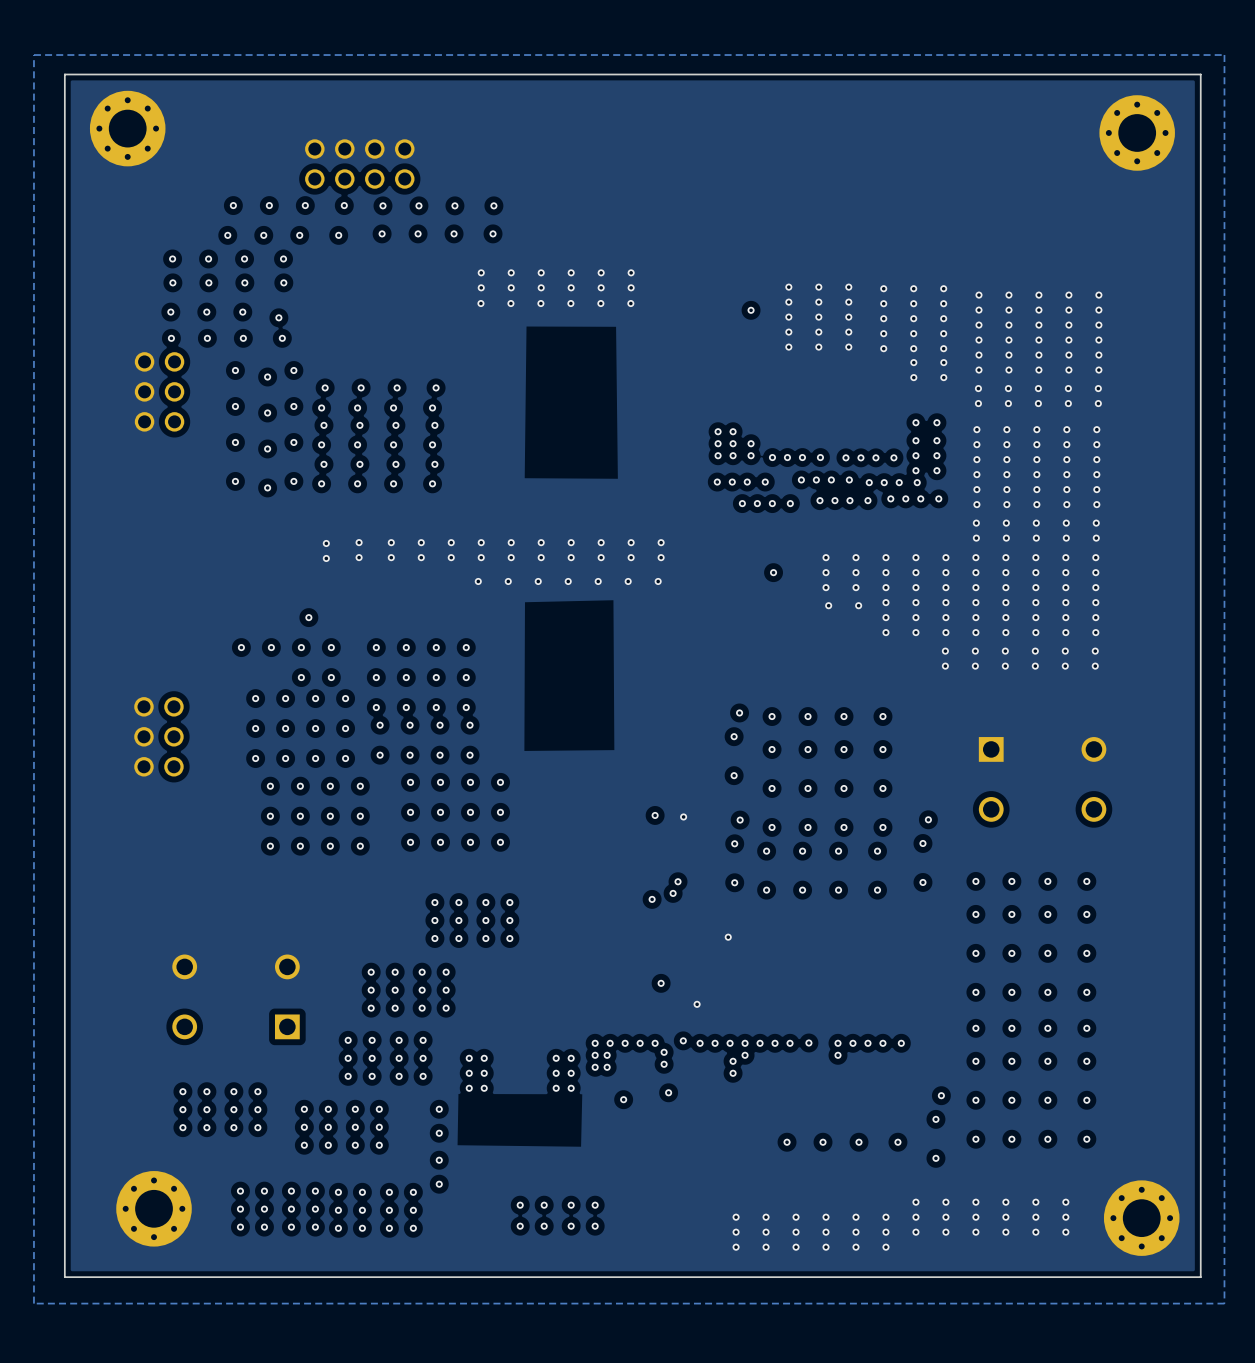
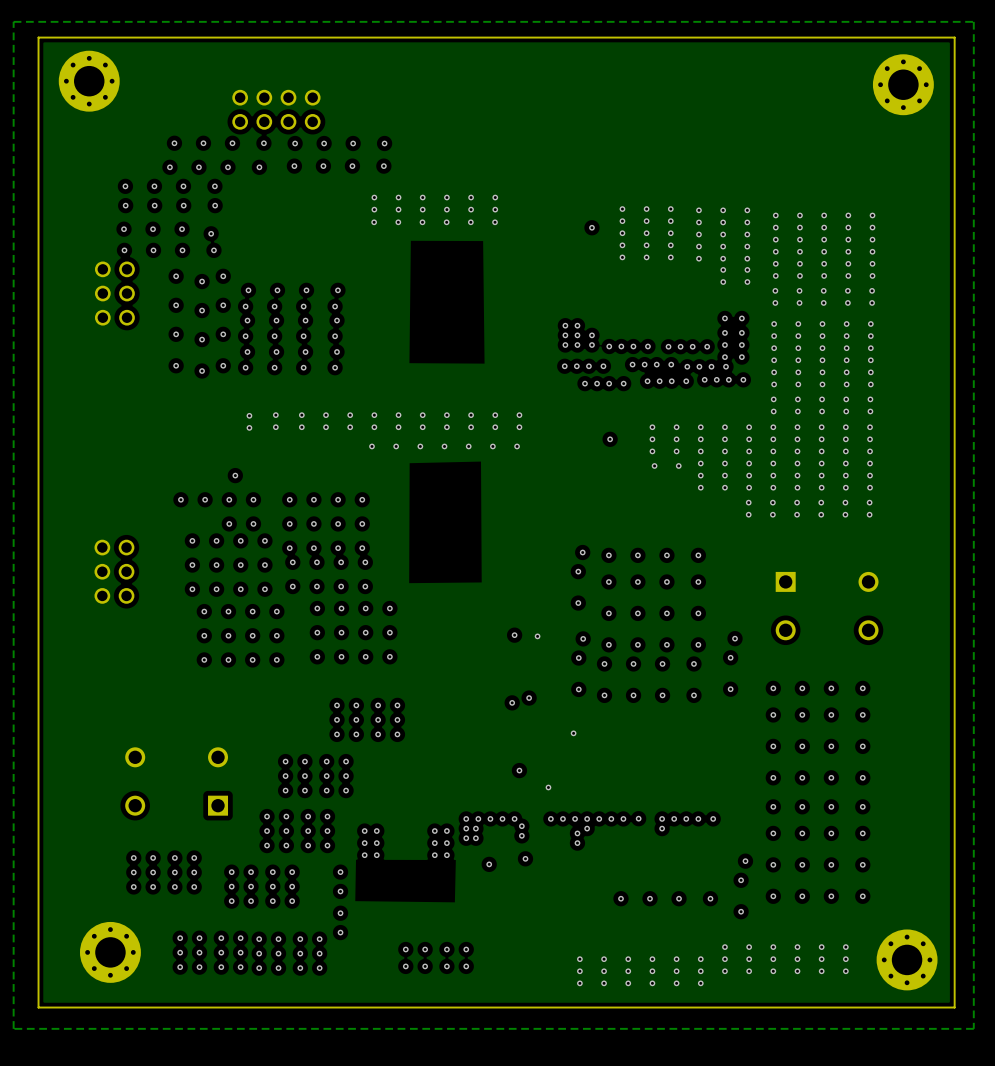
via: (678, 881) -> none
via: (683, 1040) -> none

